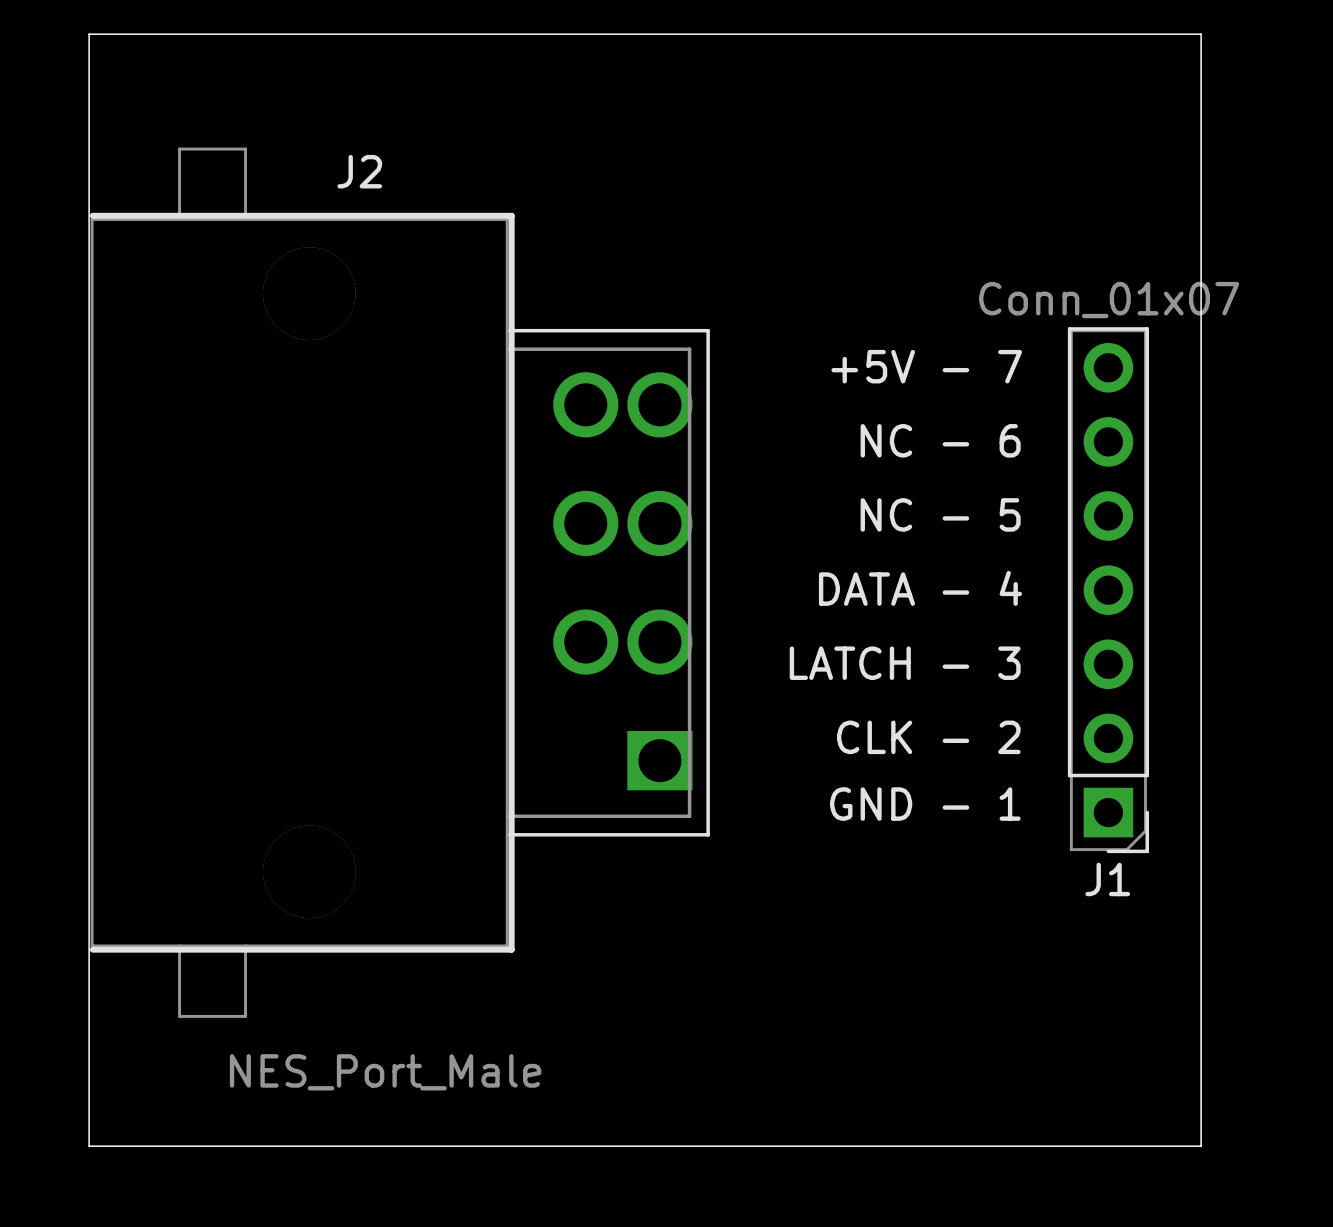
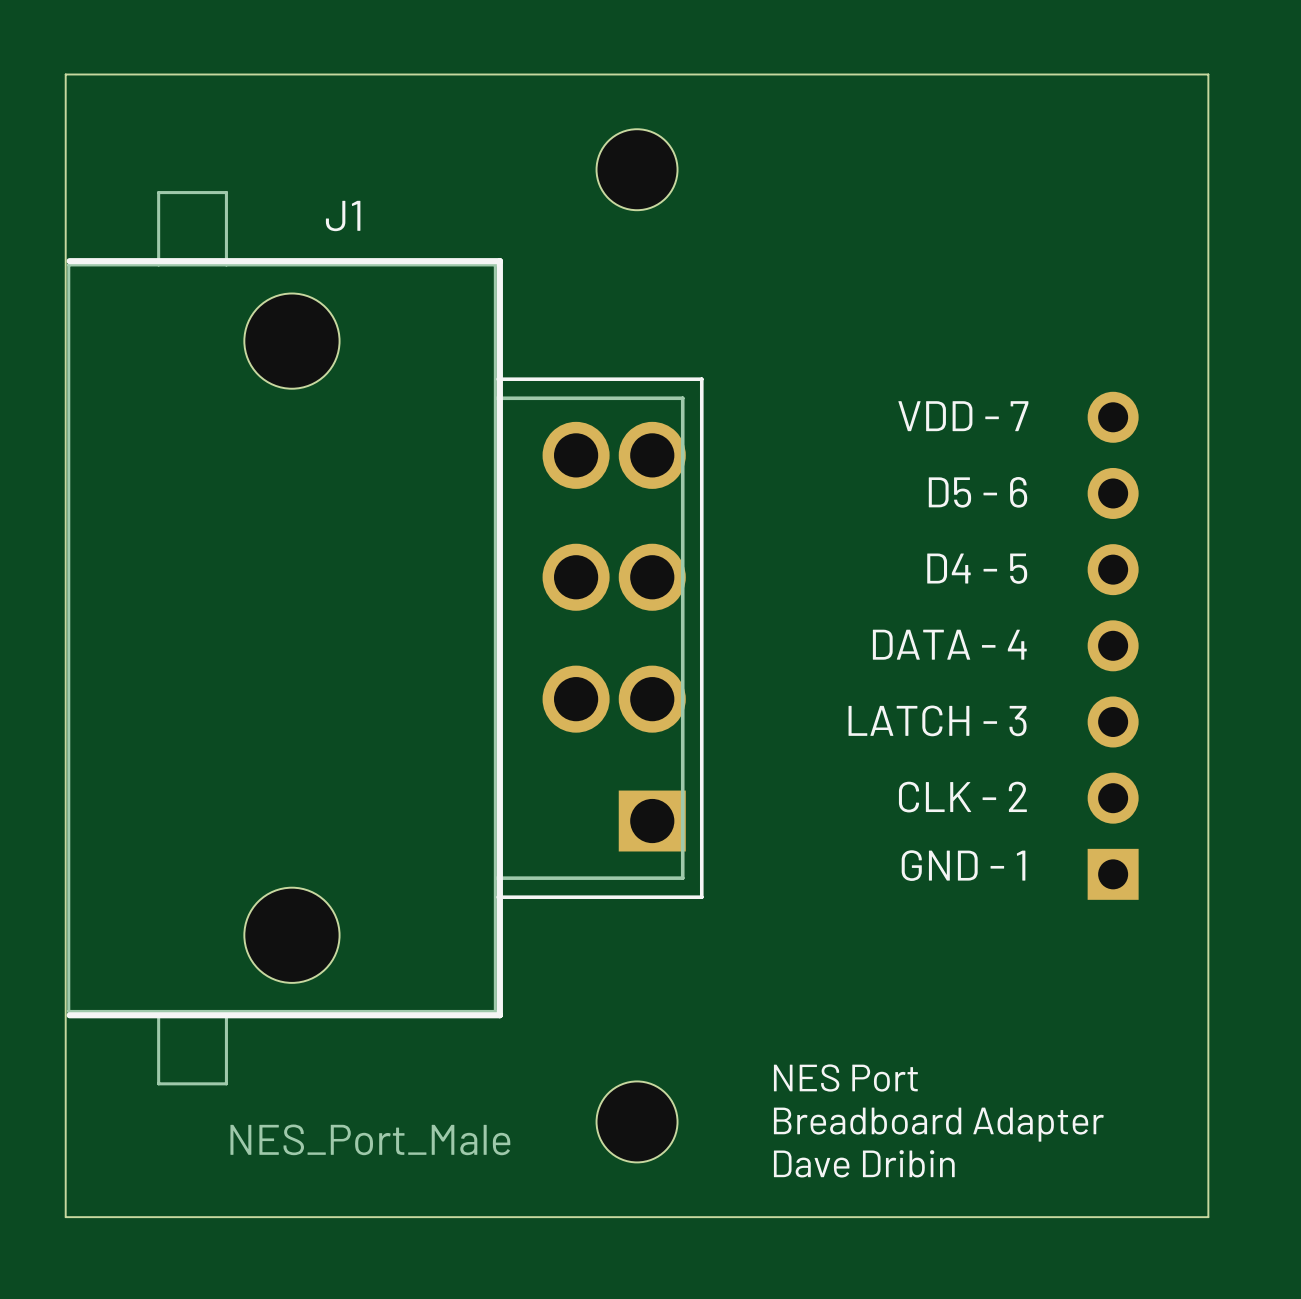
part: none -> (637, 169)
J1 value: Conn_01x07 (1109, 300) -> NES_Port_Male (370, 1139)
J1 footprint: [1067, 327, 1150, 854] -> [66, 191, 704, 1086]
text: +5V - 7 (926, 366) -> VDD - 7 (963, 416)
text: NC - 6 (940, 440) -> D5 - 6 (977, 492)
text: NC - 5 (940, 514) -> D4 - 5 (977, 568)
J2: NES_Port_Male (399, 582) -> none
J1 name position: J1 (1107, 879) -> J1 (343, 215)
text: none -> NES Port (845, 1078)
part: none -> (637, 1121)
text: none -> Breadboard Adapter (938, 1124)
text: none -> Dave Dribin (864, 1163)

